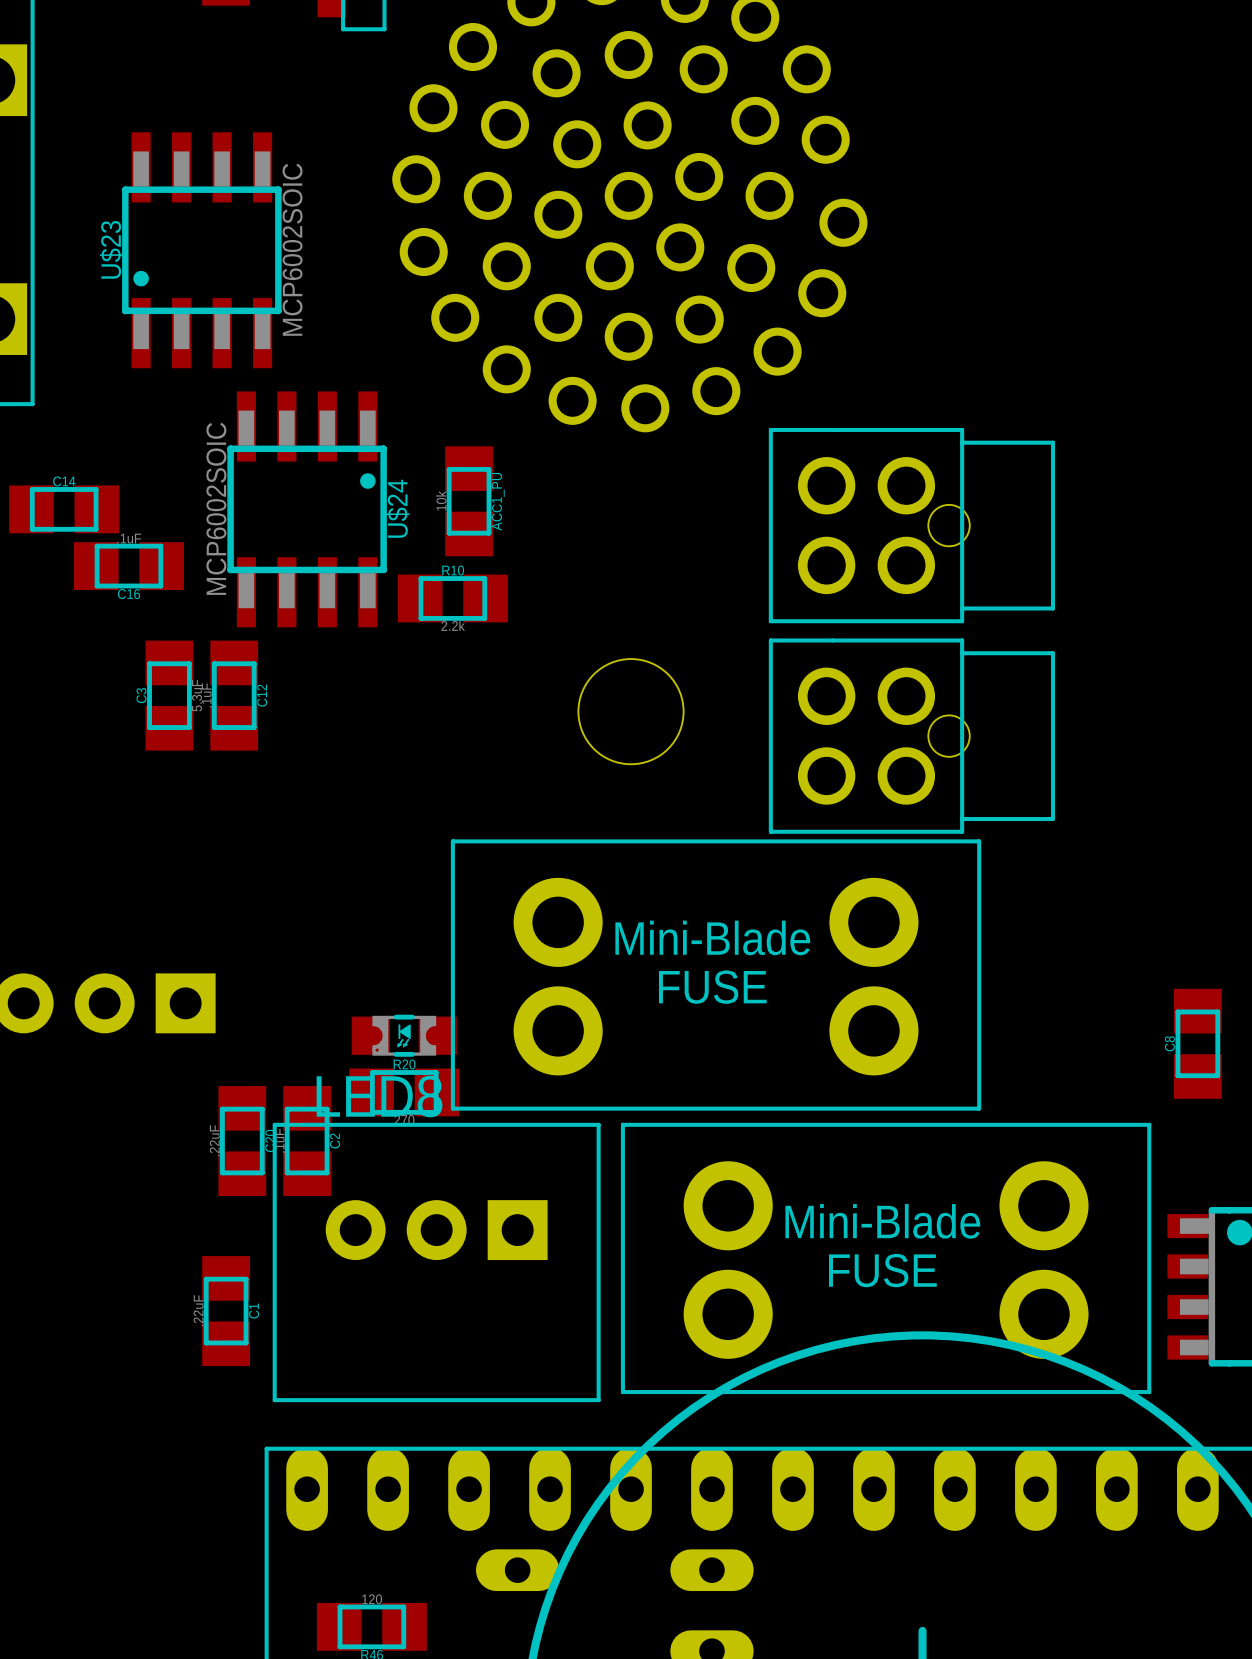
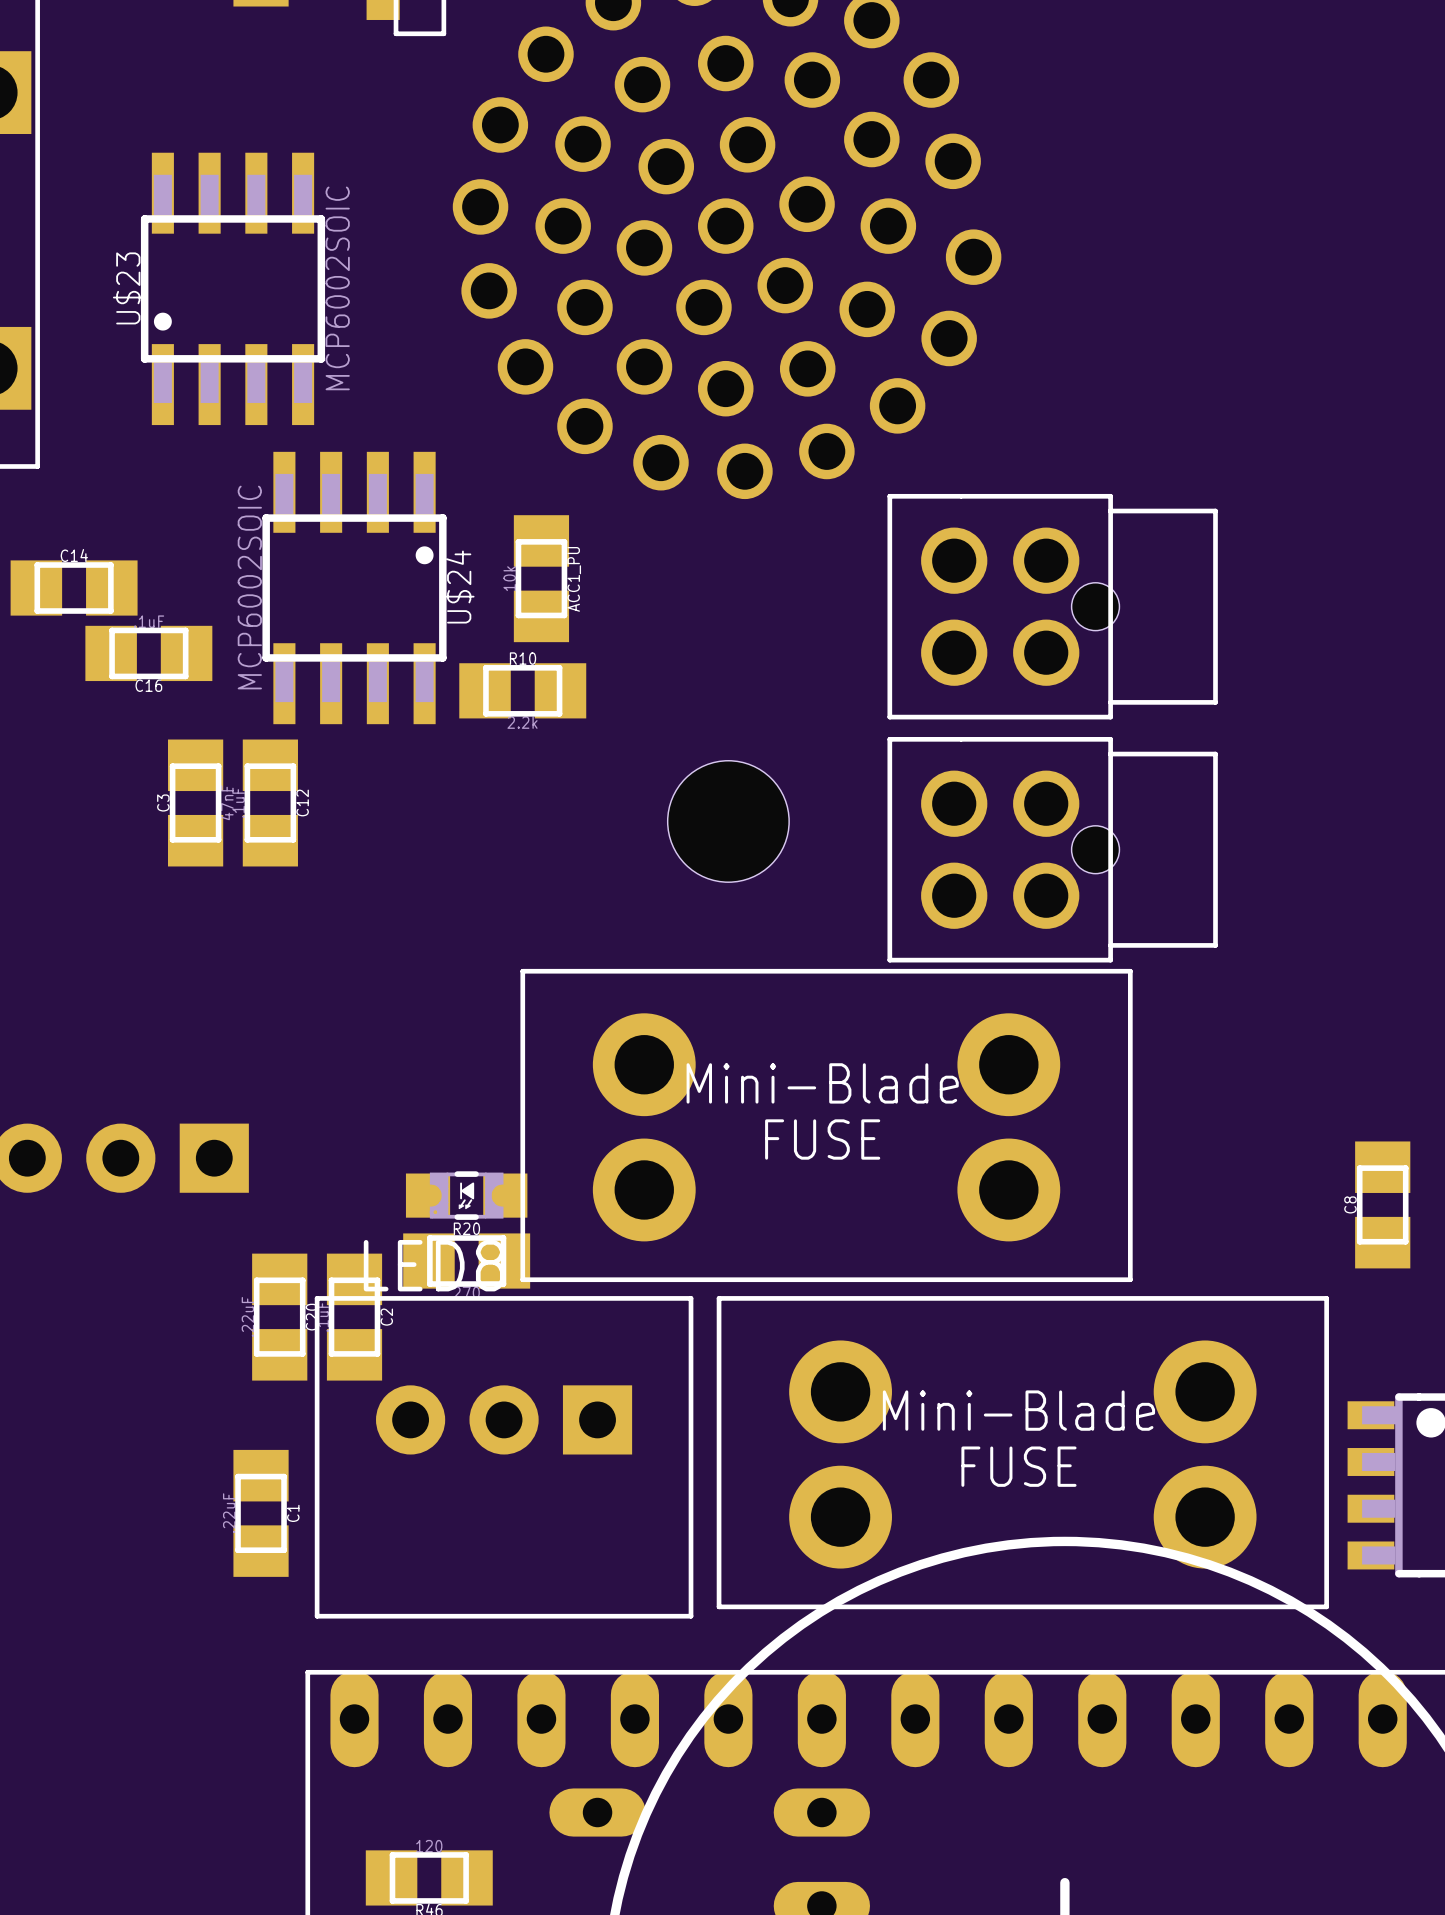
C3 value: 5.3uF (196, 695) -> 47nF (227, 802)

